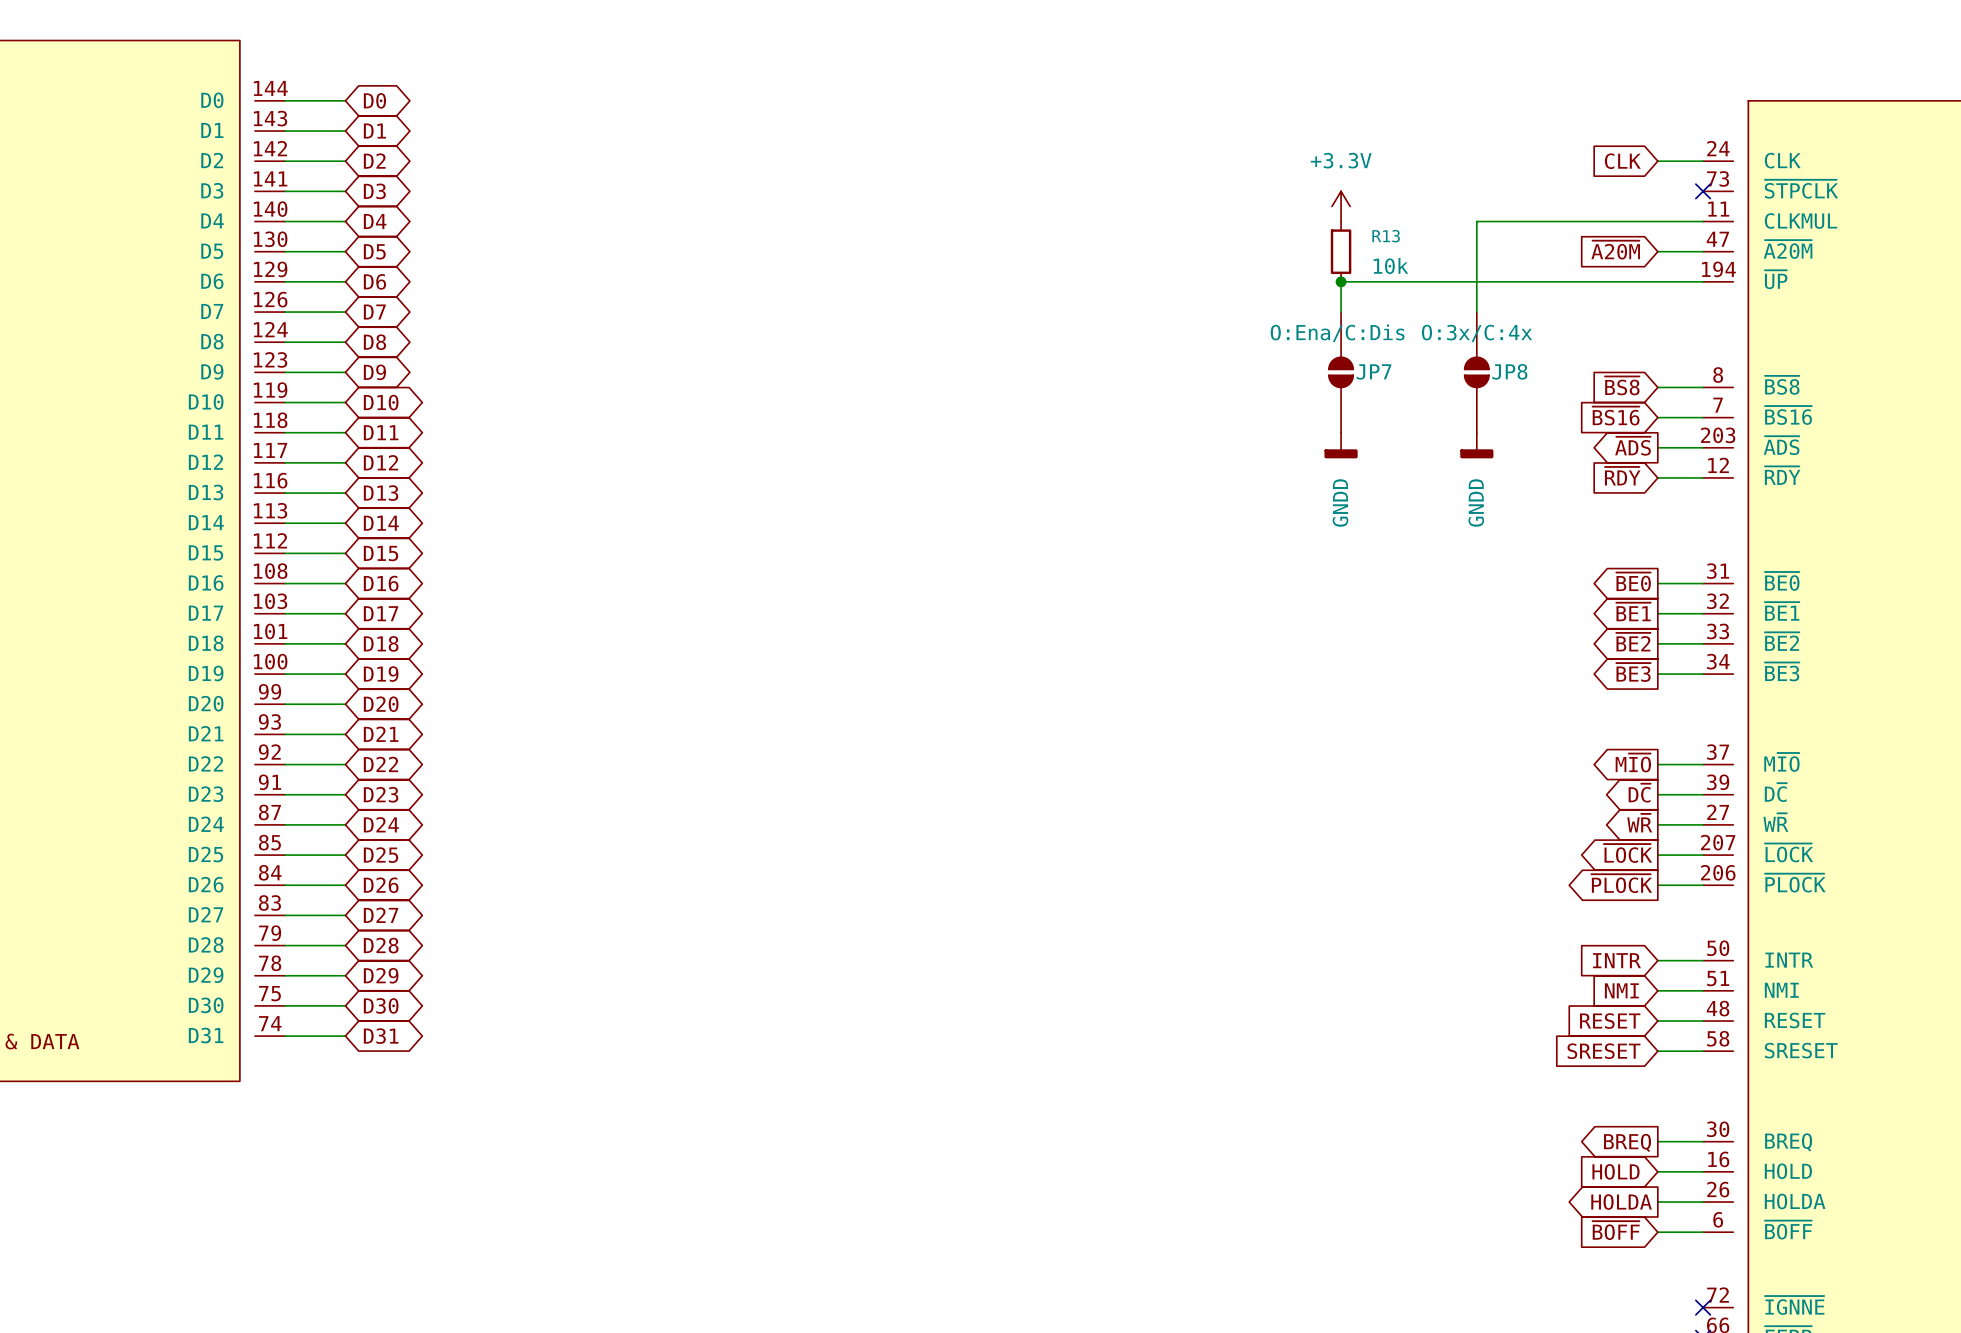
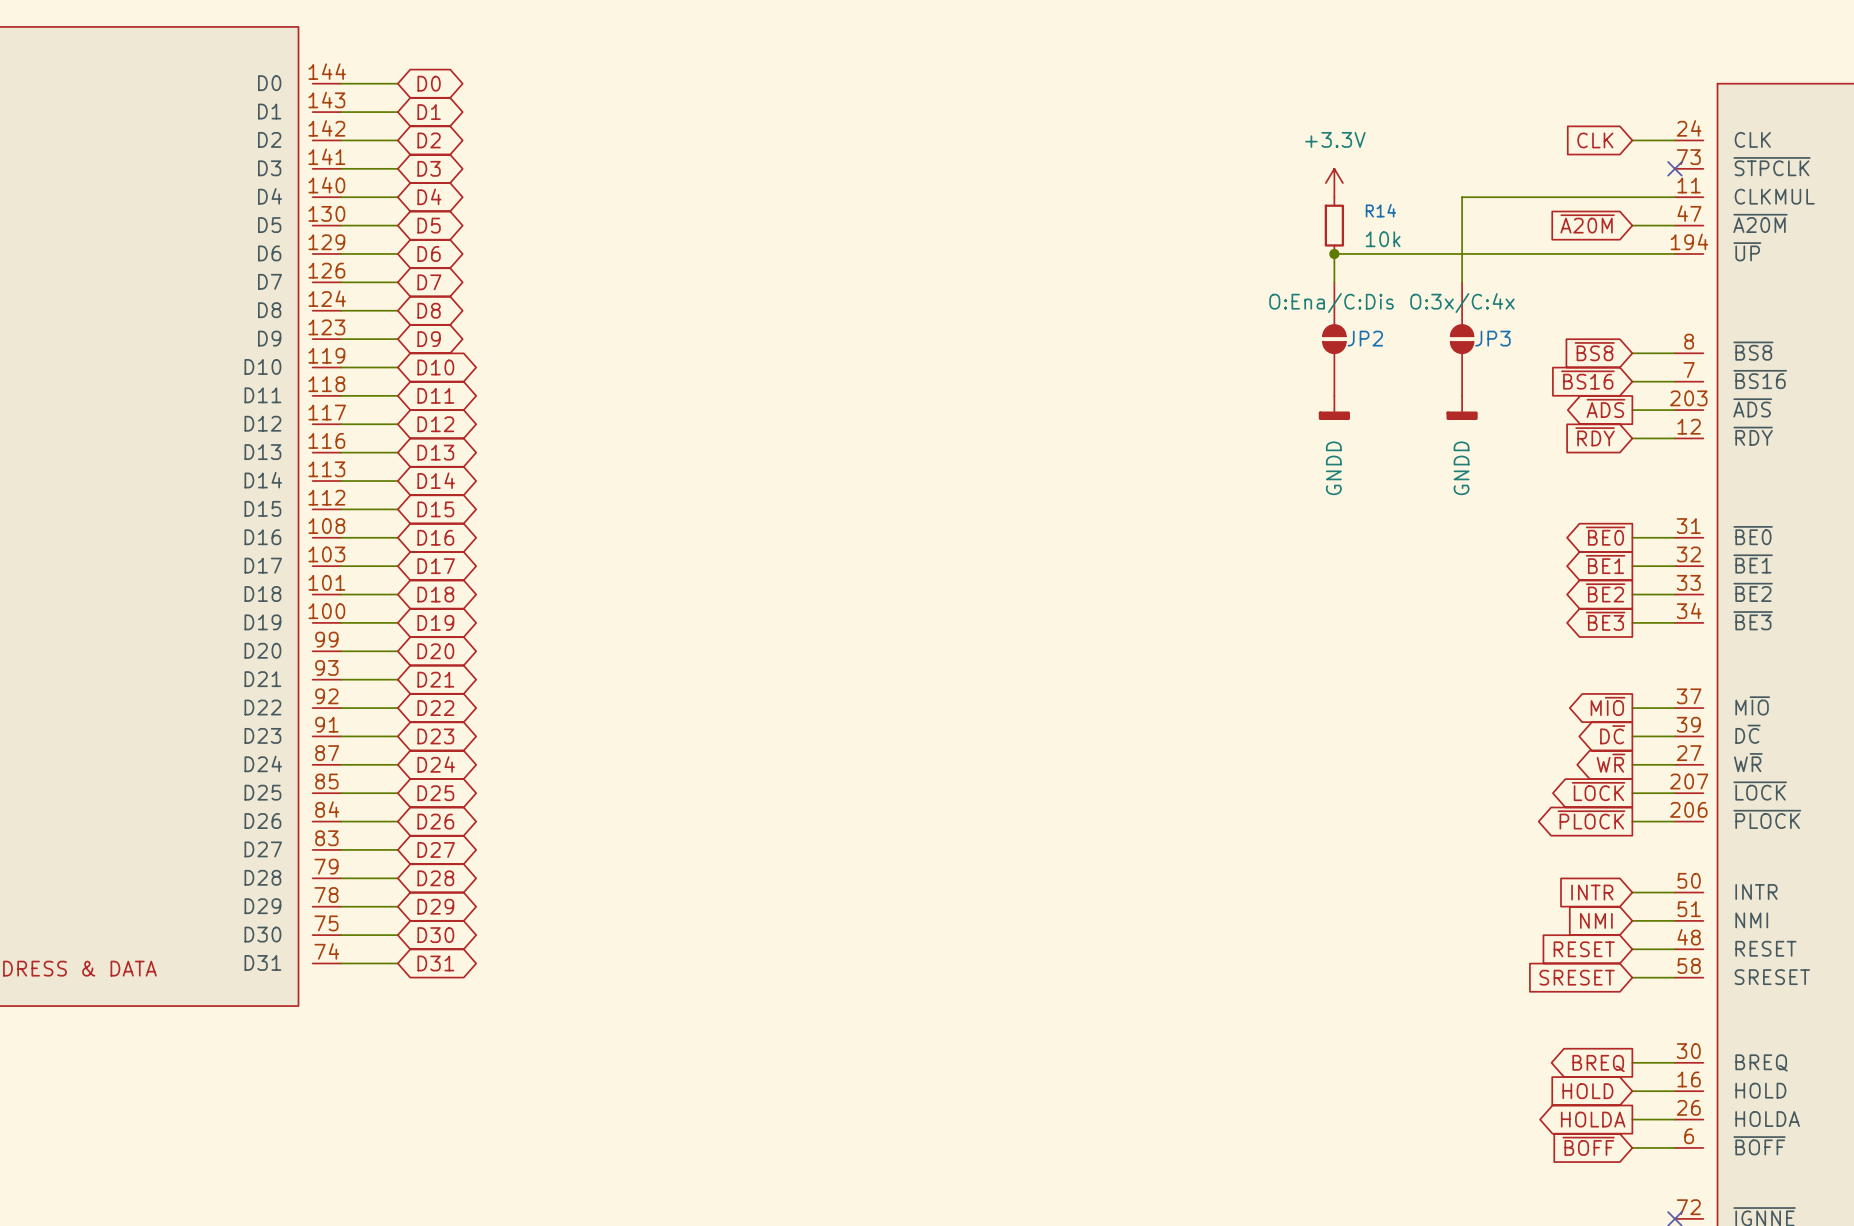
R13 name: R13 (1386, 236) -> R14 (1380, 210)
JP7 name: JP7 (1374, 371) -> JP2 (1365, 338)
JP8 name: JP8 (1509, 371) -> JP3 (1492, 338)

